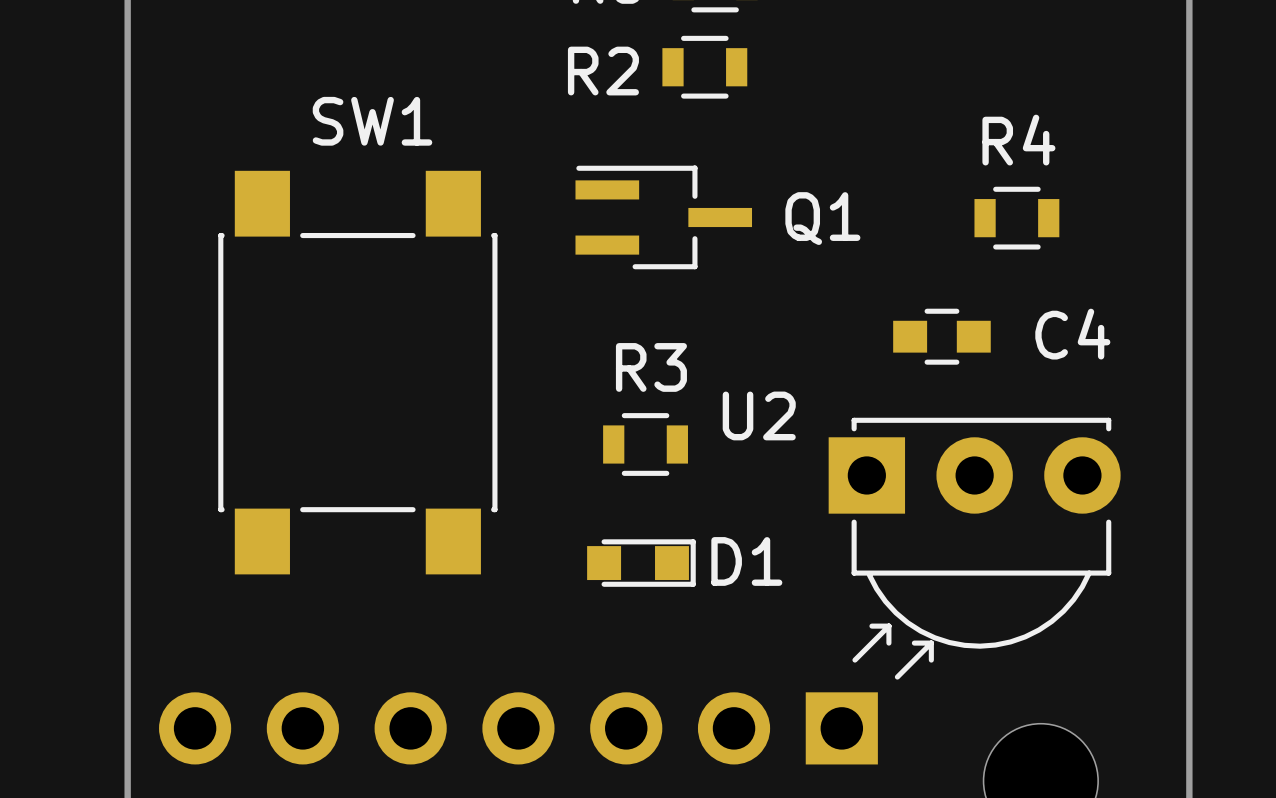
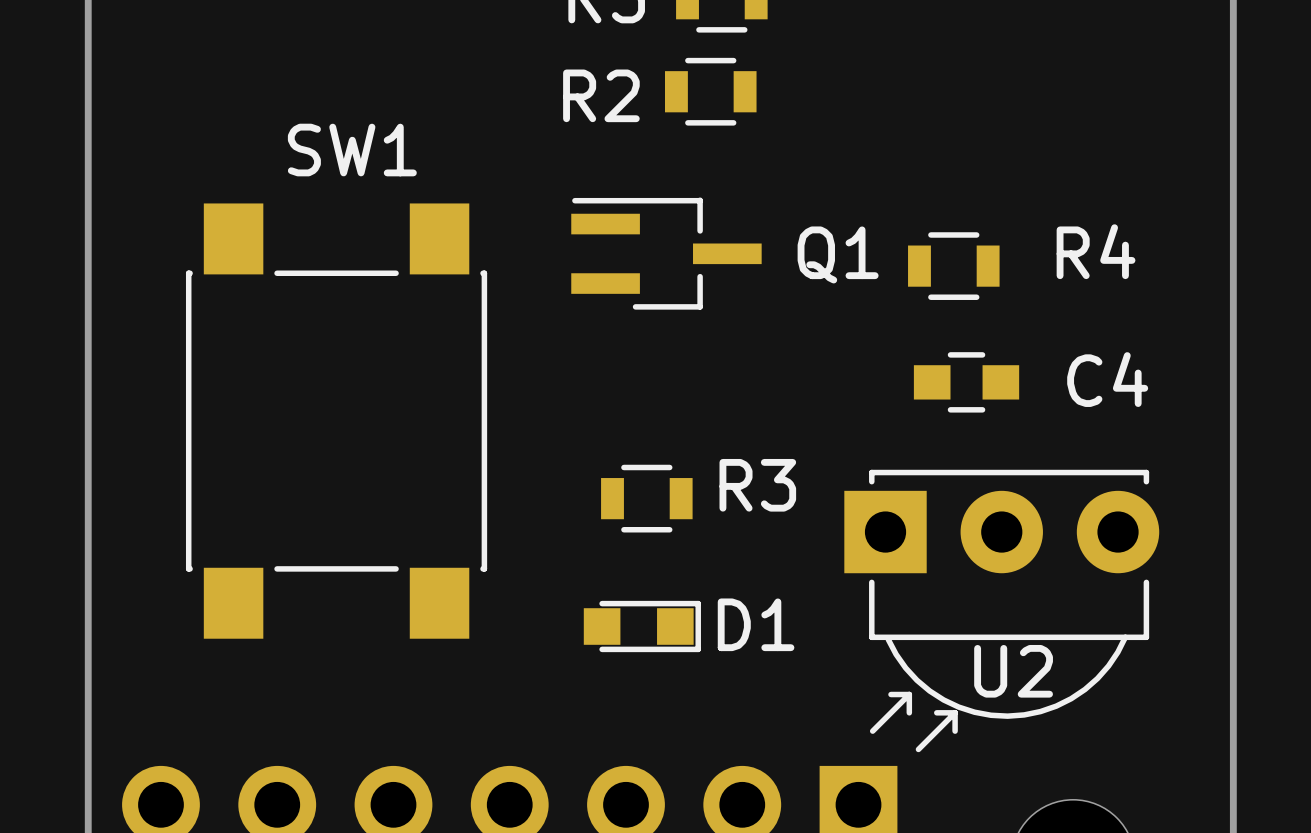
R4 name position: R4 (1018, 140) -> R4 (1096, 251)
R4 position: (1016, 218) -> (953, 266)
R3 name position: R3 (651, 367) -> R3 (757, 485)
U2 name position: U2 (759, 415) -> U2 (1013, 671)

